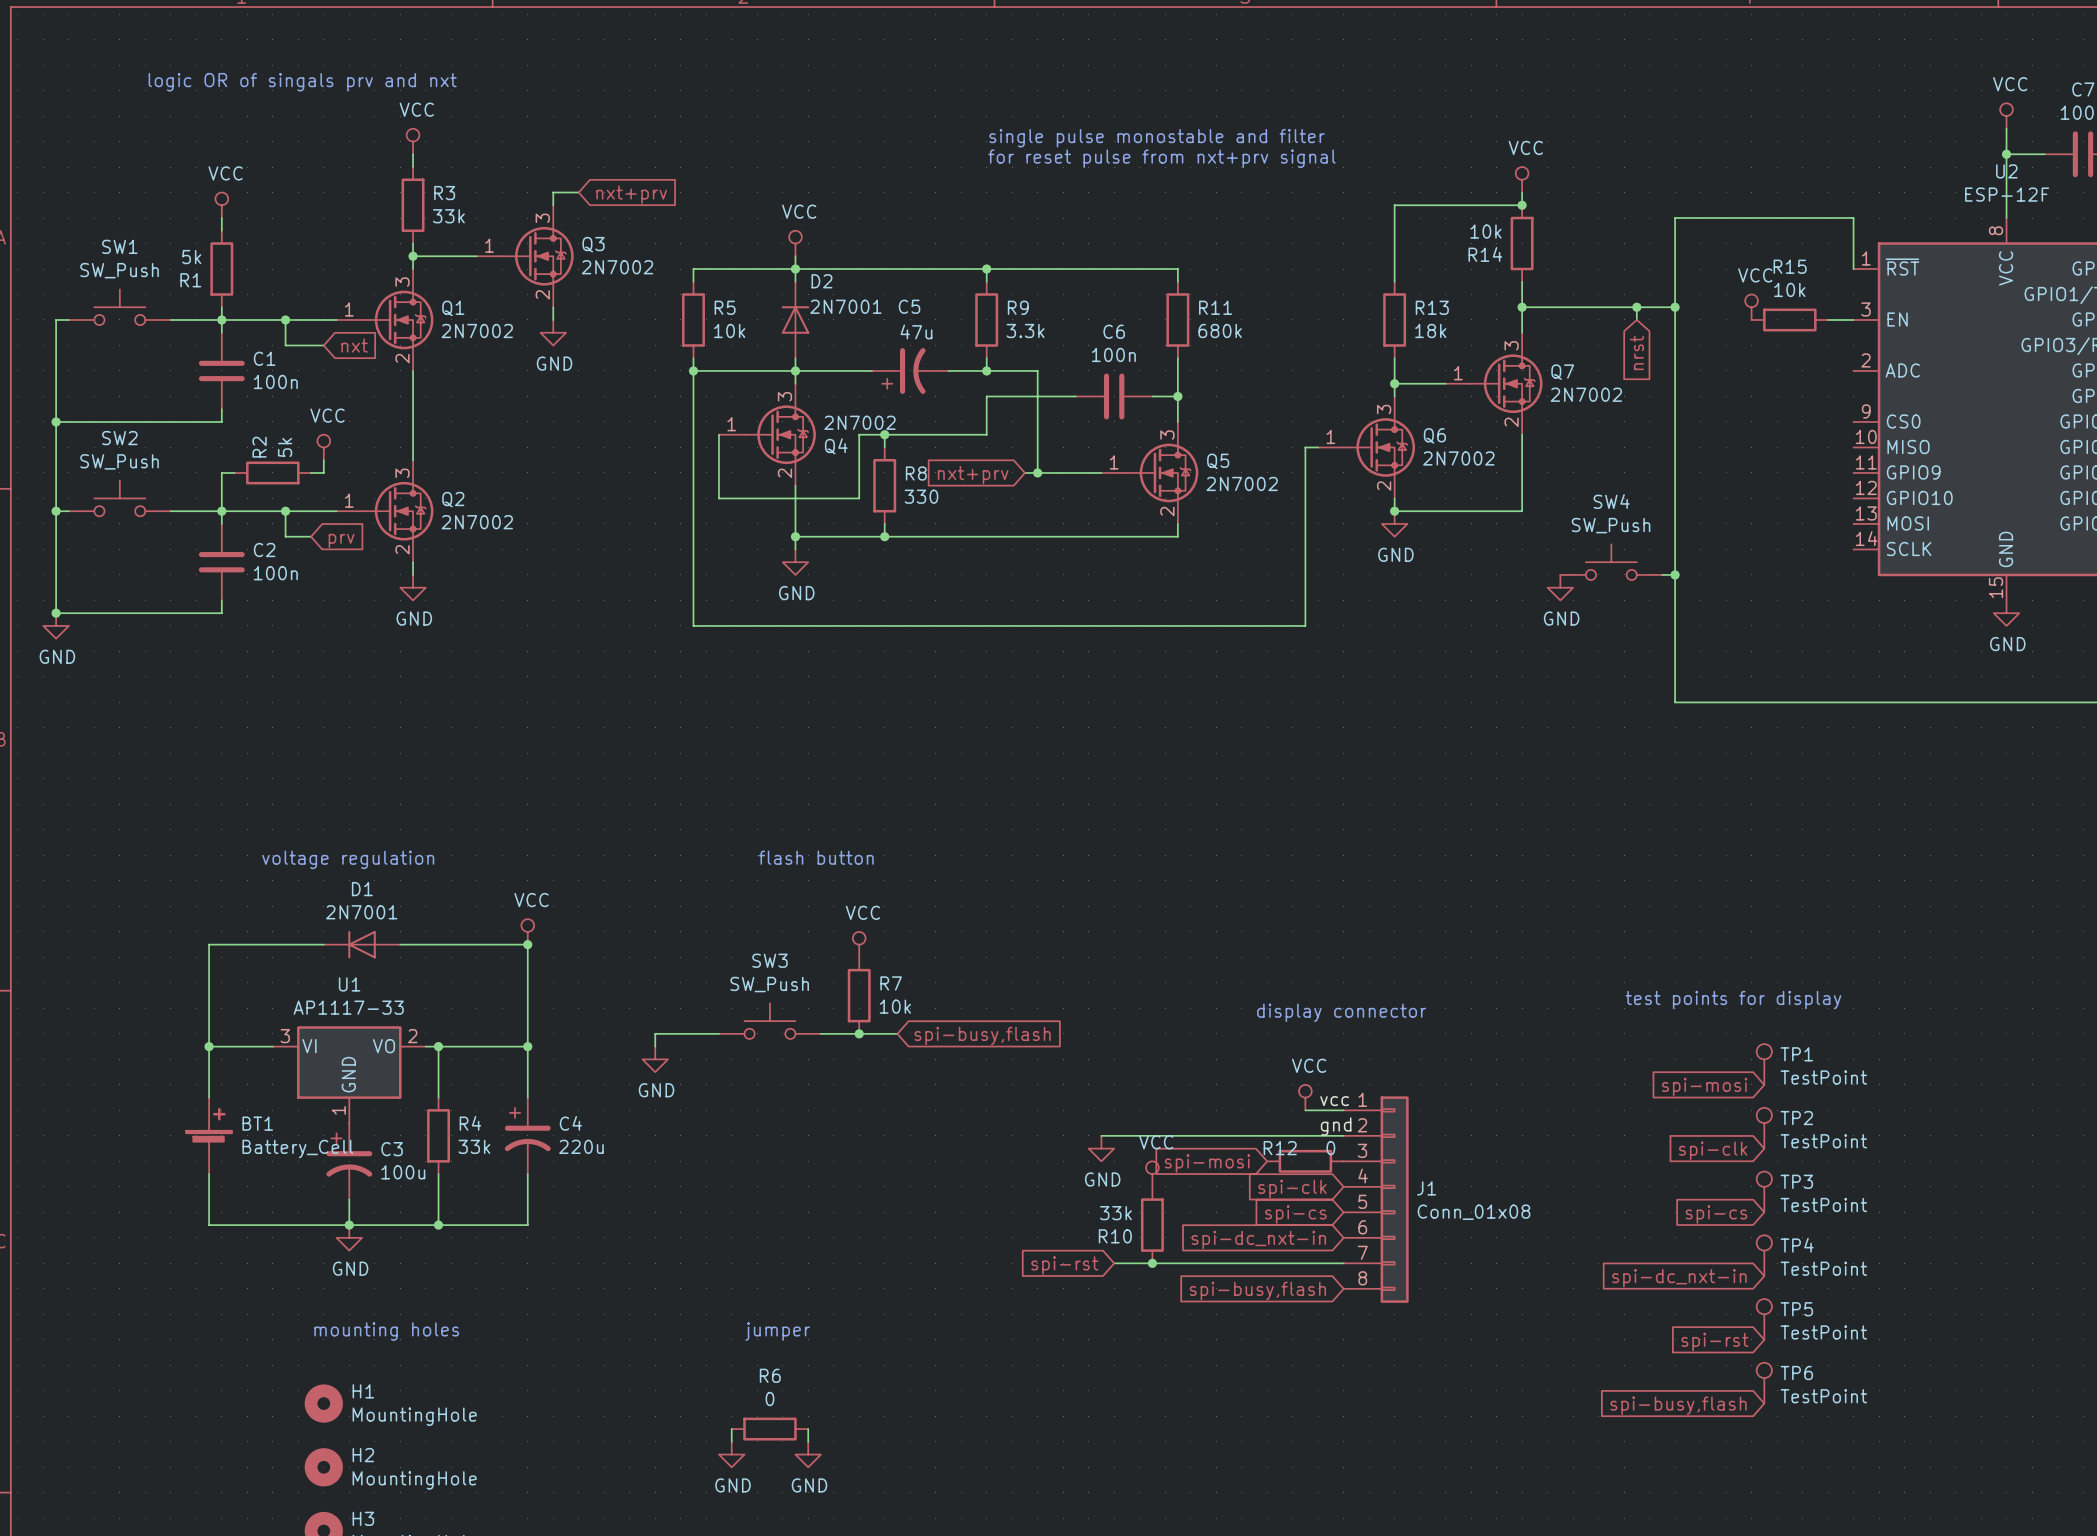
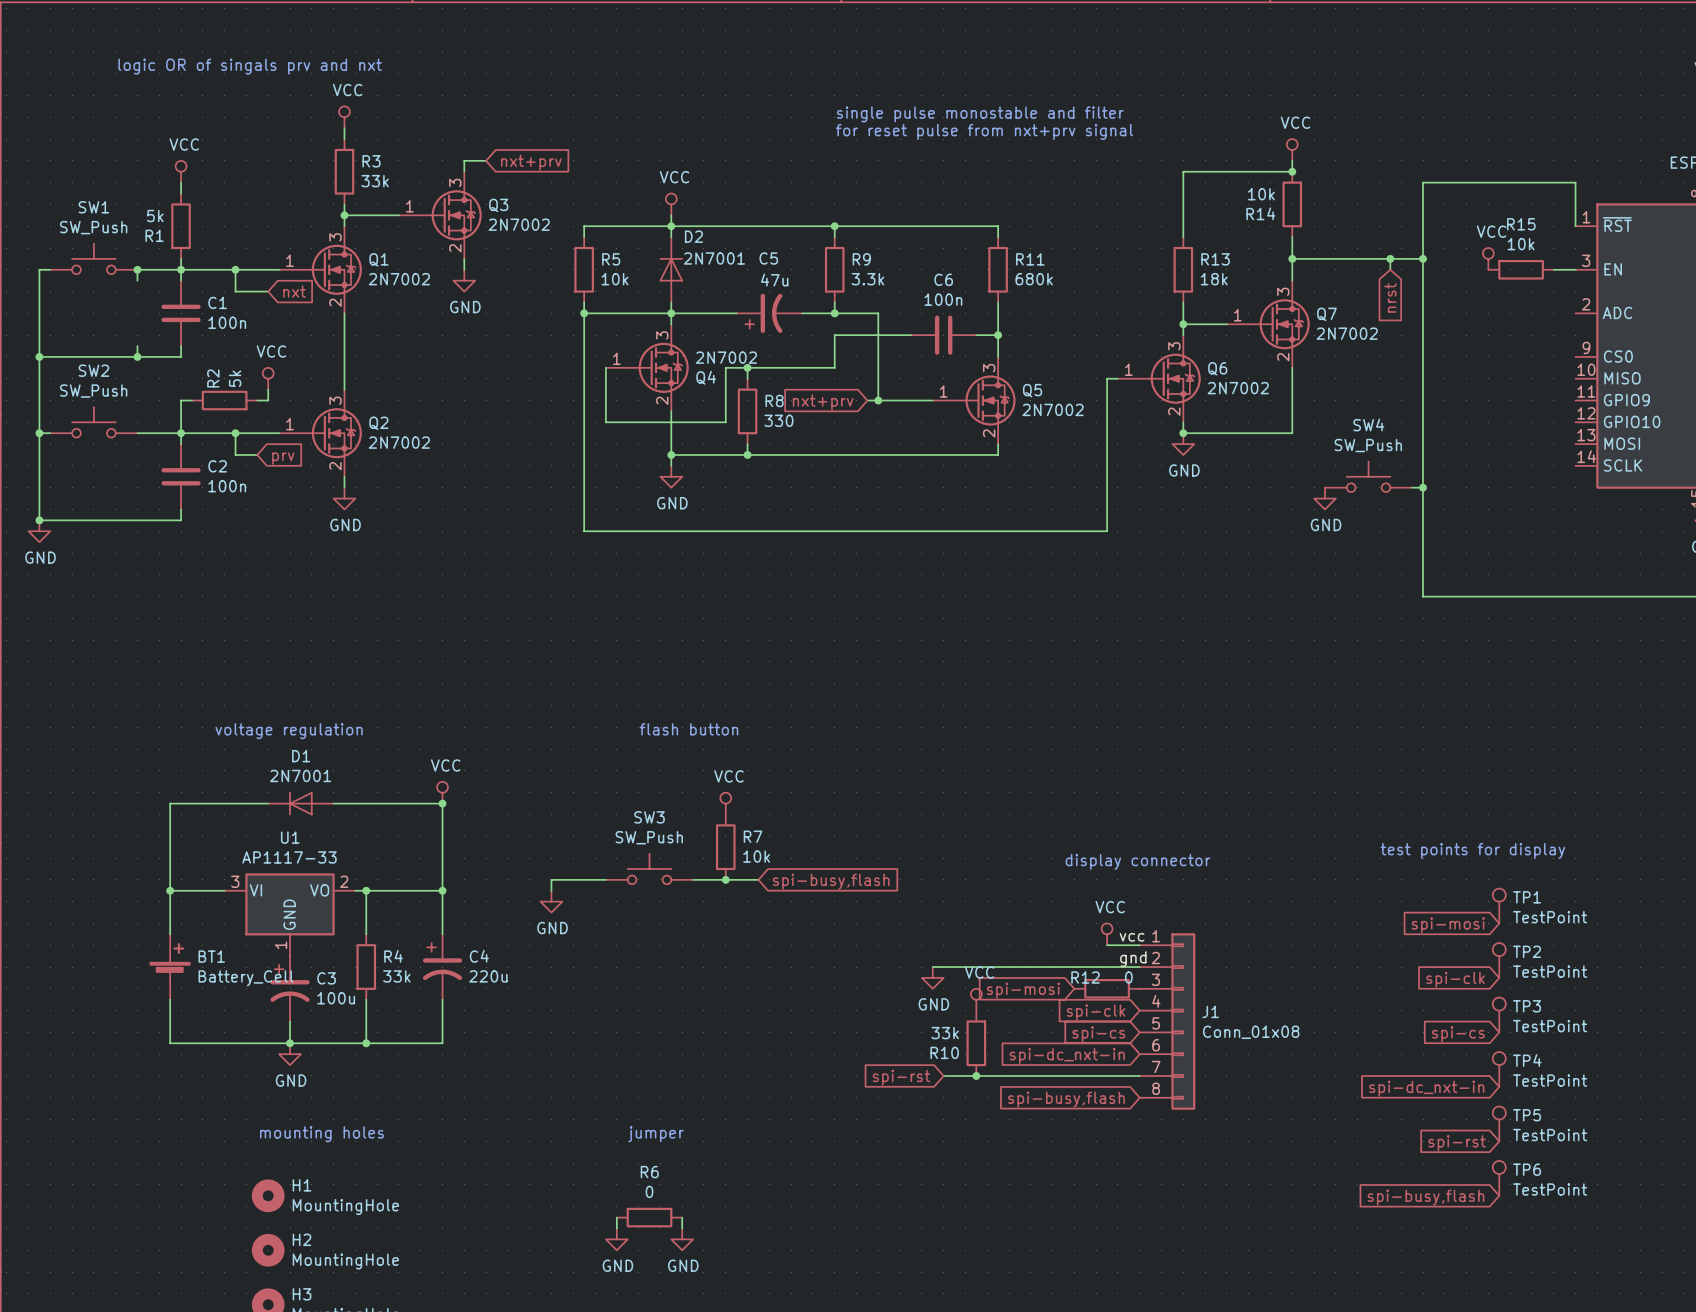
wire: none -> (137, 269) (137, 280)
junction: none -> (137, 269)
wire: none -> (137, 346) (137, 356)
junction: none -> (137, 356)

